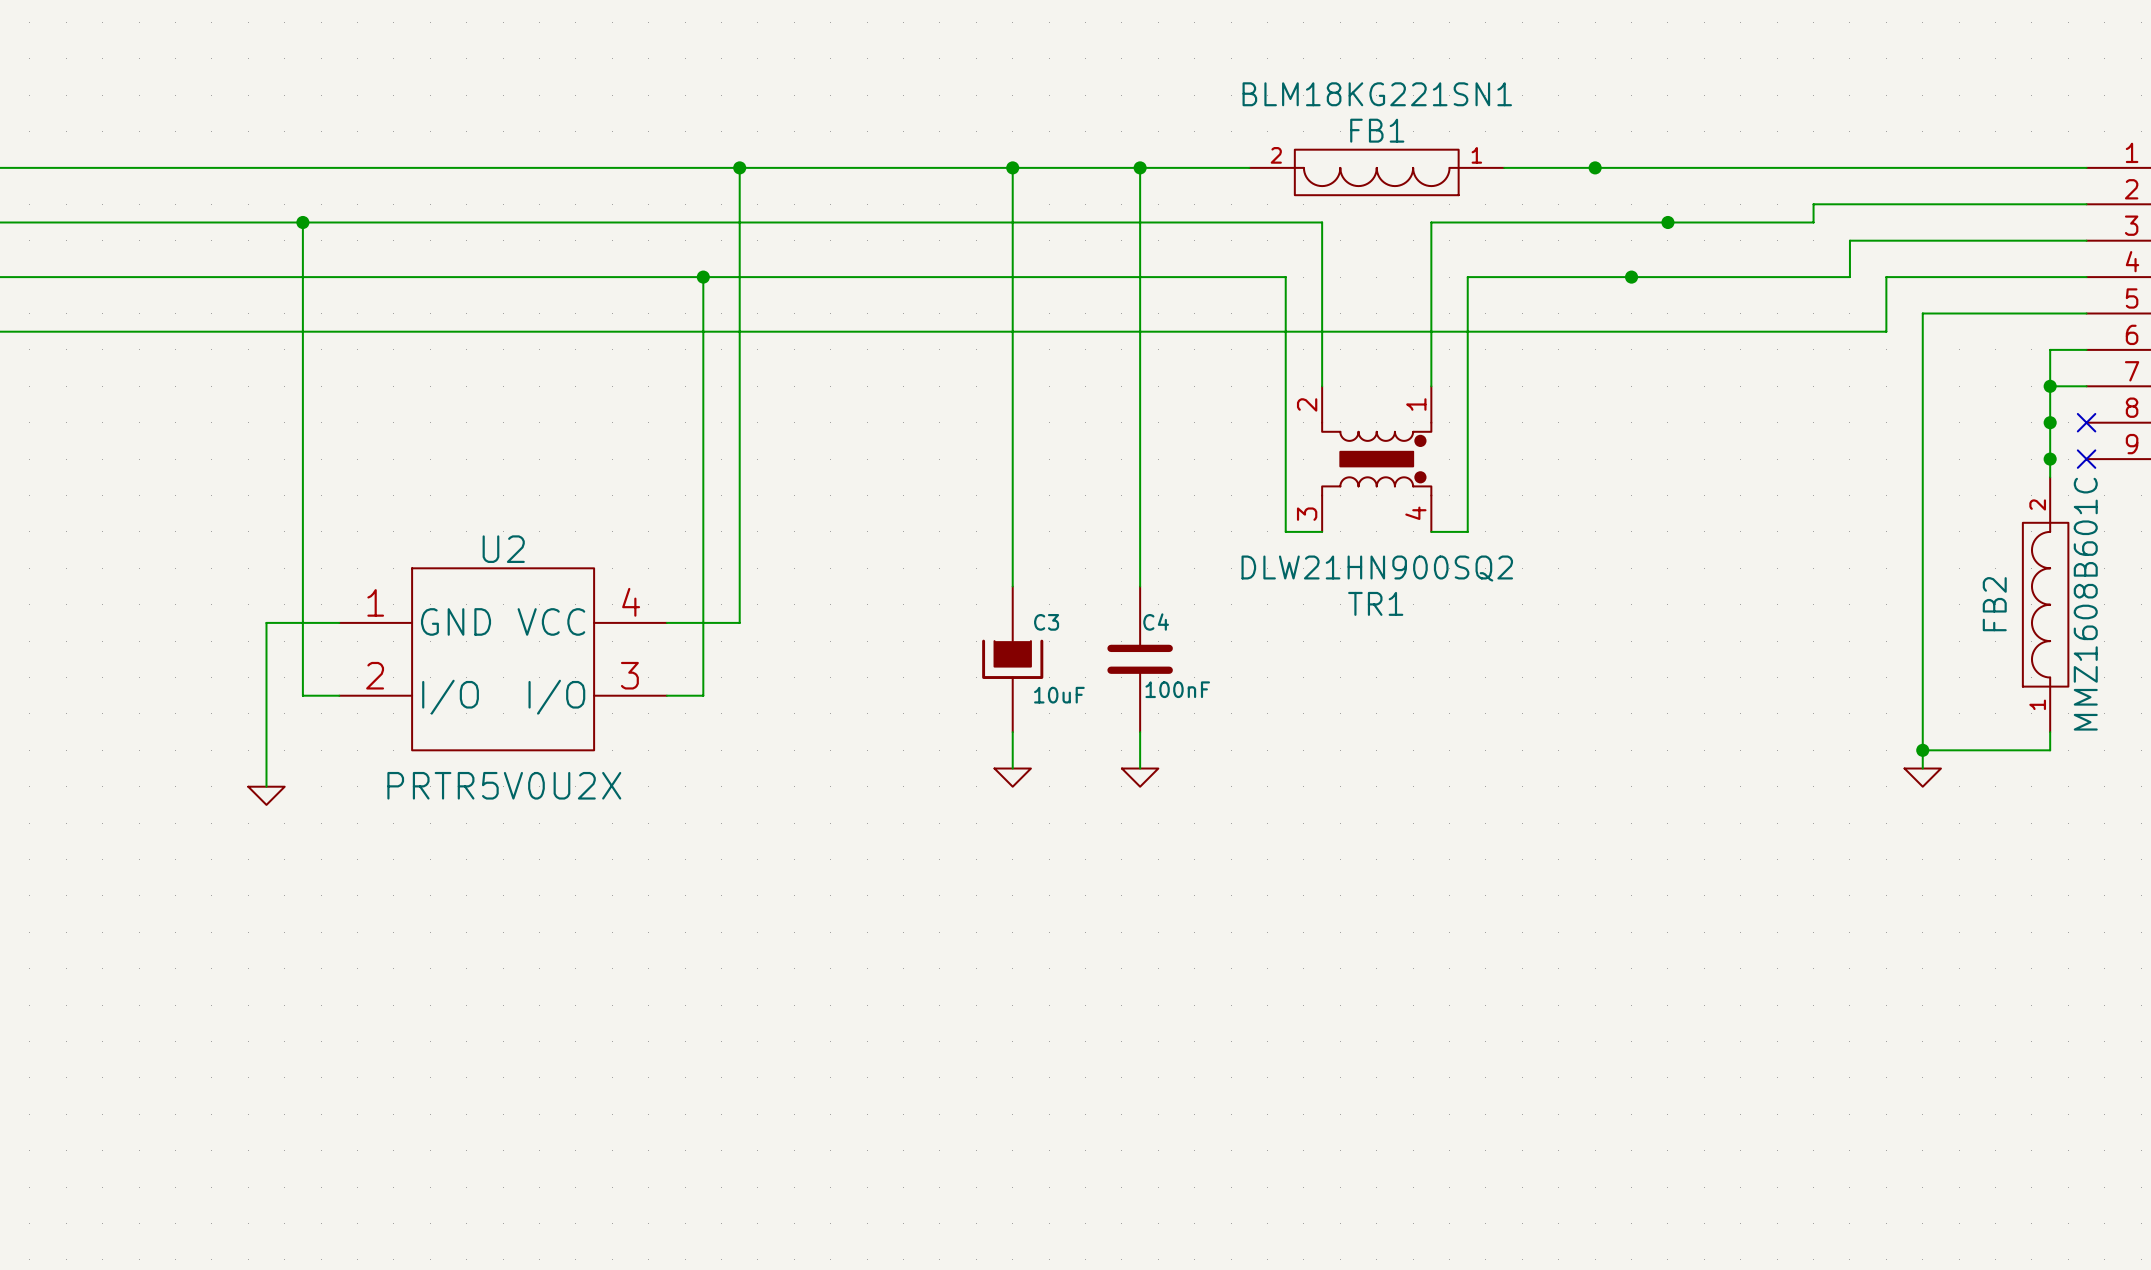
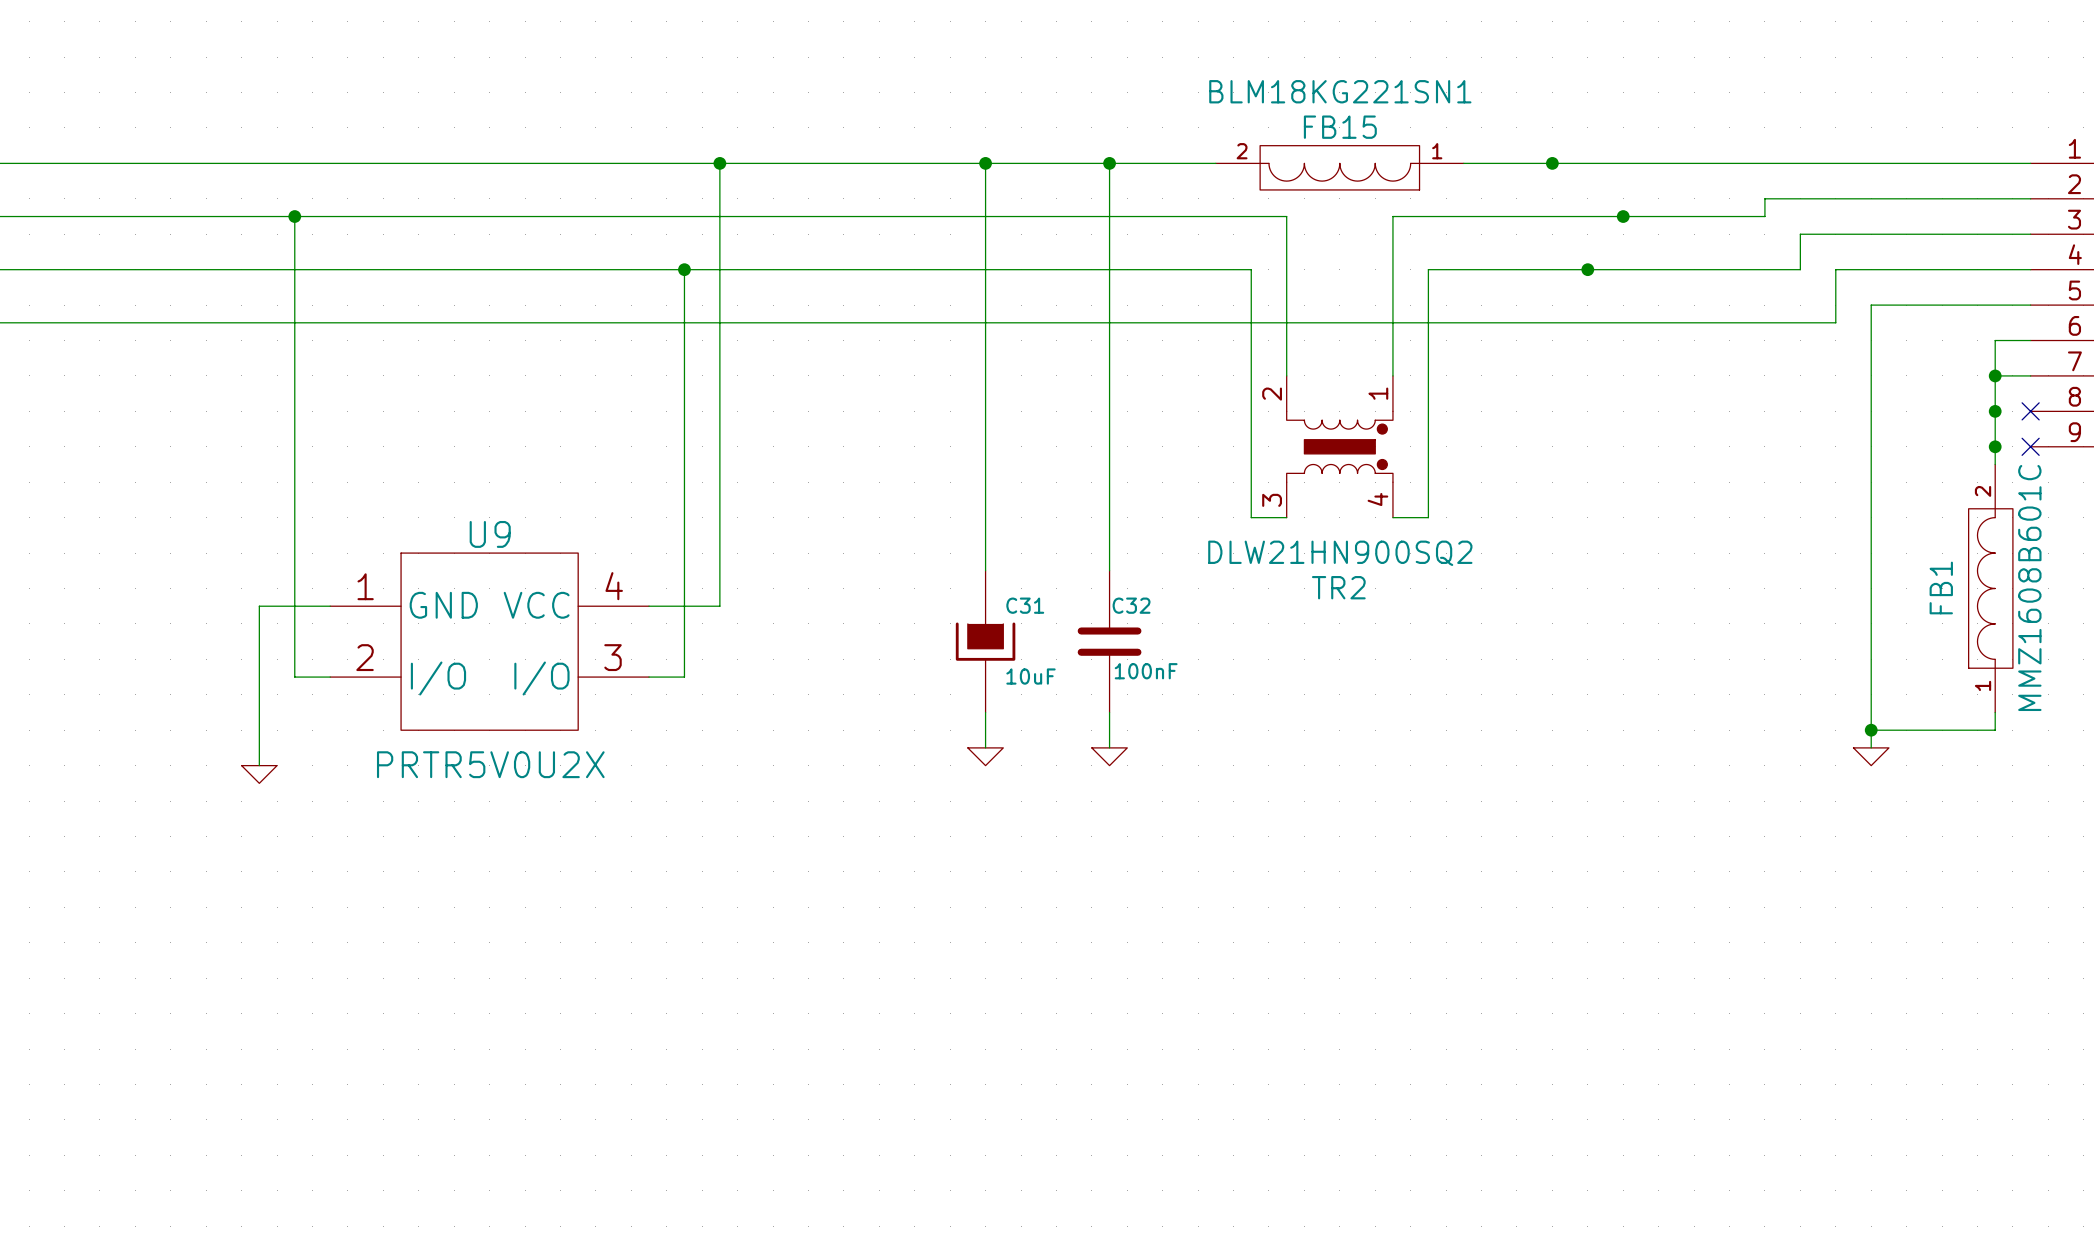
FB1 name: FB1 (1377, 130) -> FB15 (1340, 127)
U2 name: U2 (503, 549) -> U9 (490, 534)
TR1 name: TR1 (1375, 603) -> TR2 (1338, 587)
FB2 name: FB2 (1994, 604) -> FB1 (1941, 587)
C3 name: C3 (1046, 622) -> C31 (1025, 605)
C4 name: C4 (1156, 622) -> C32 (1131, 605)

